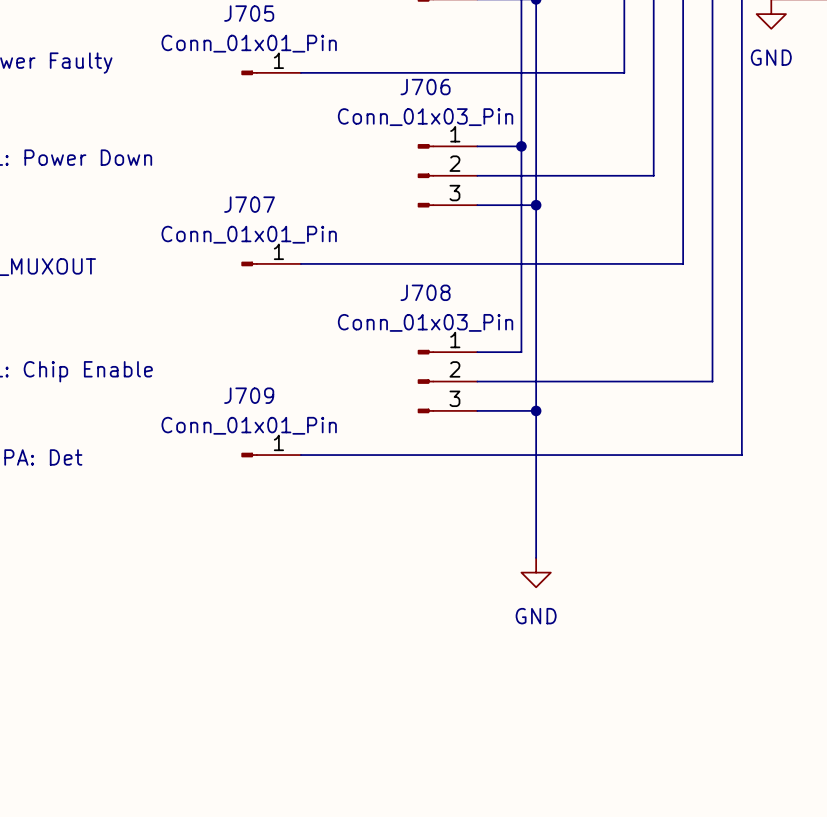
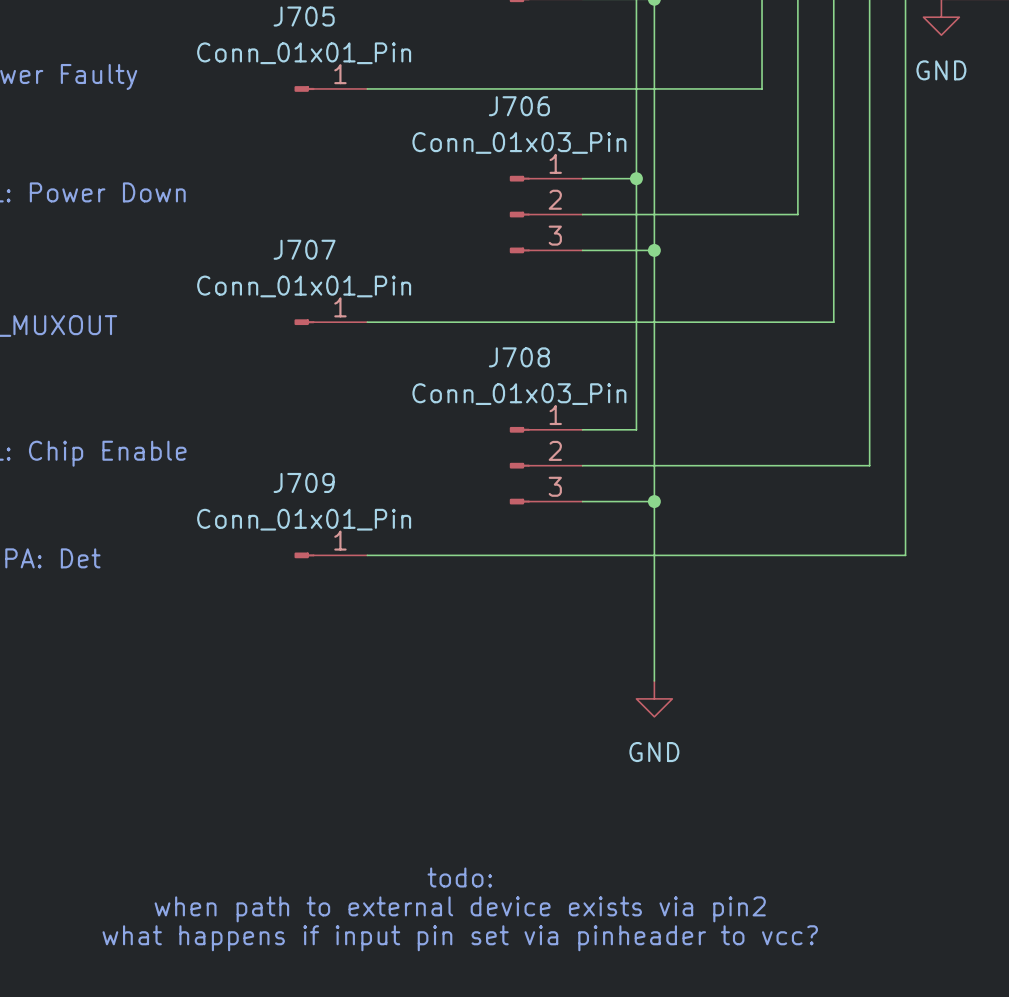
text: none -> todo: (459, 877)
text: none -> when path to external device exists via pin2 (460, 909)
text: none -> what happens if input pin set via pinheader to vcc? (460, 938)

